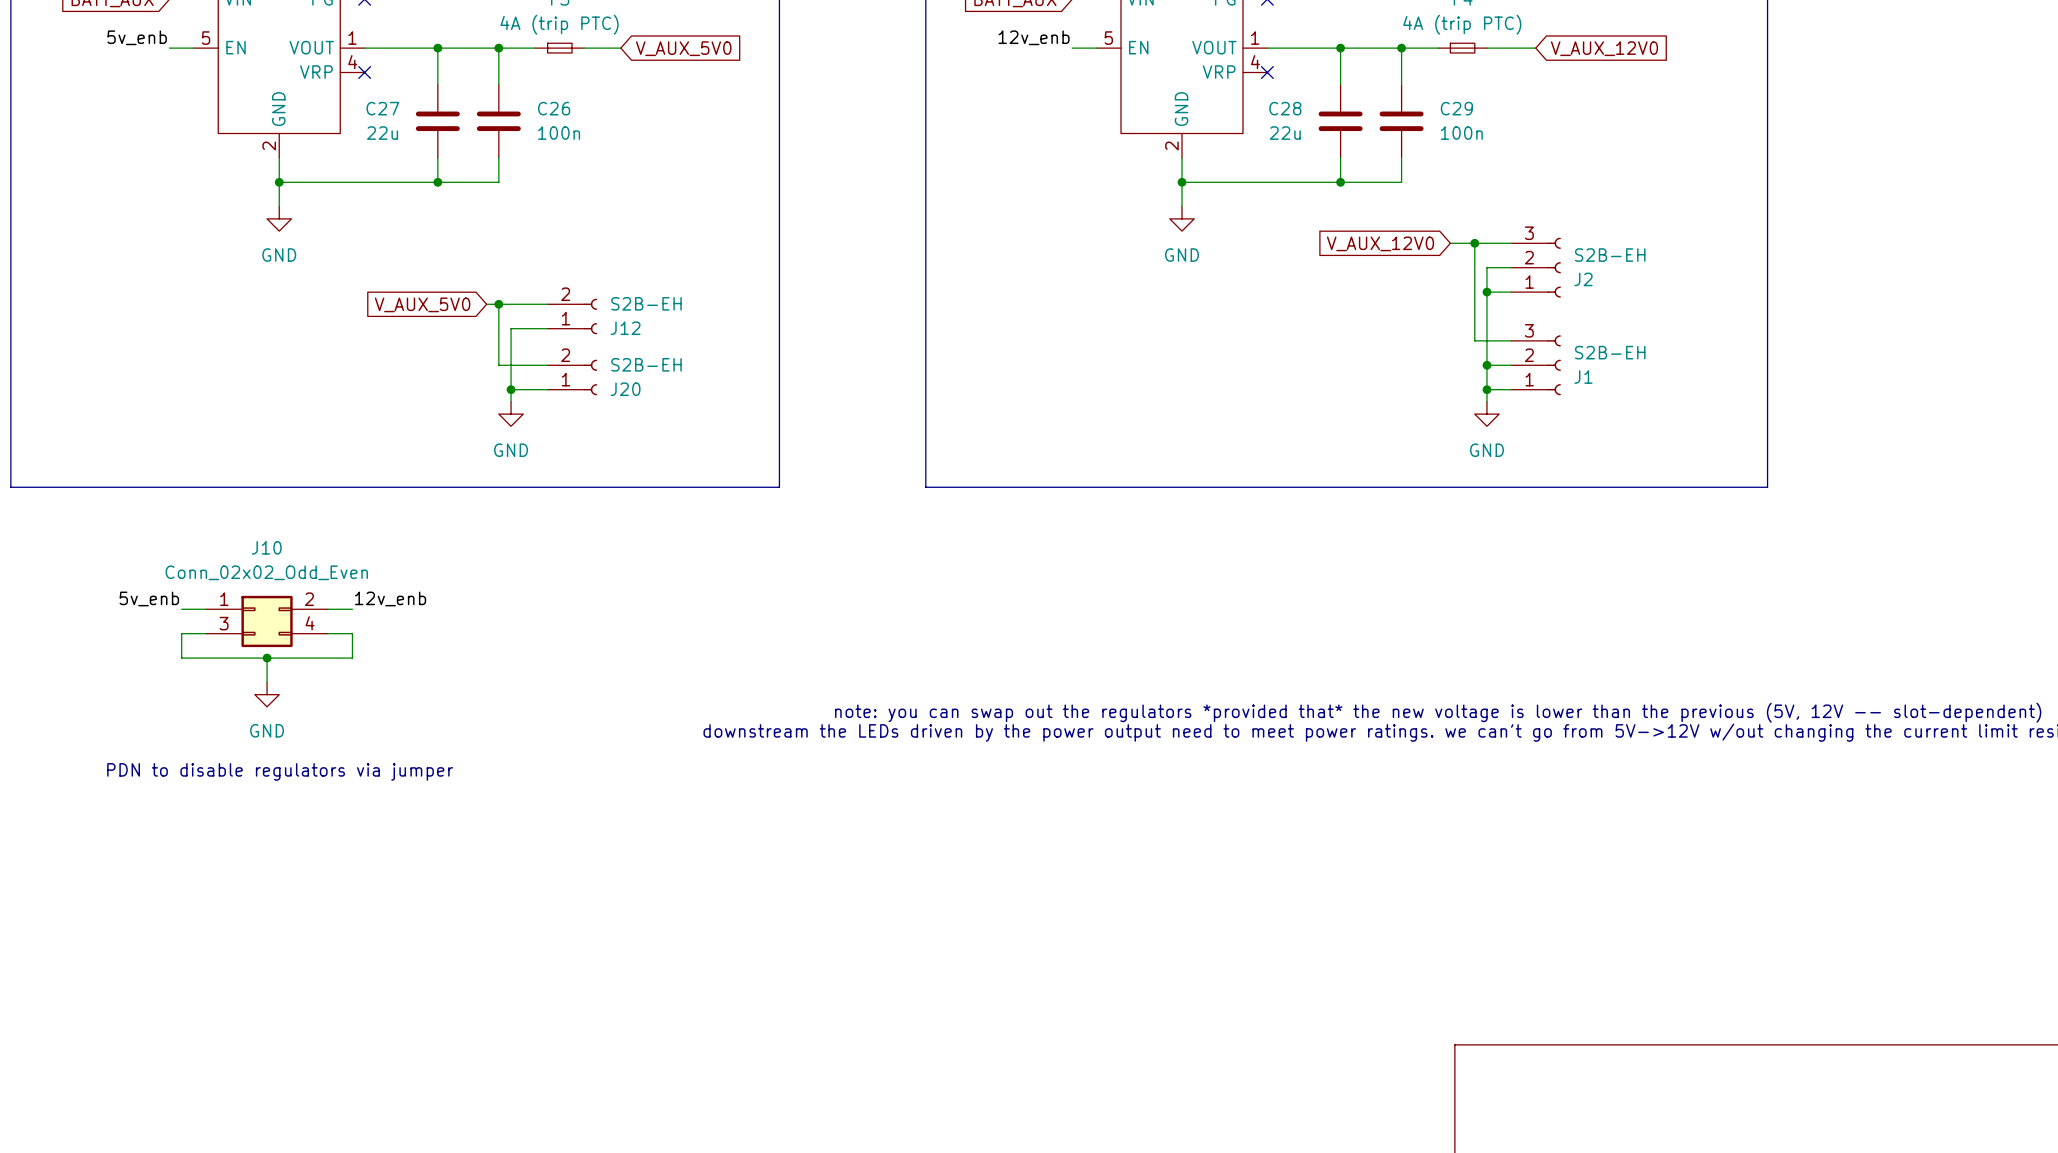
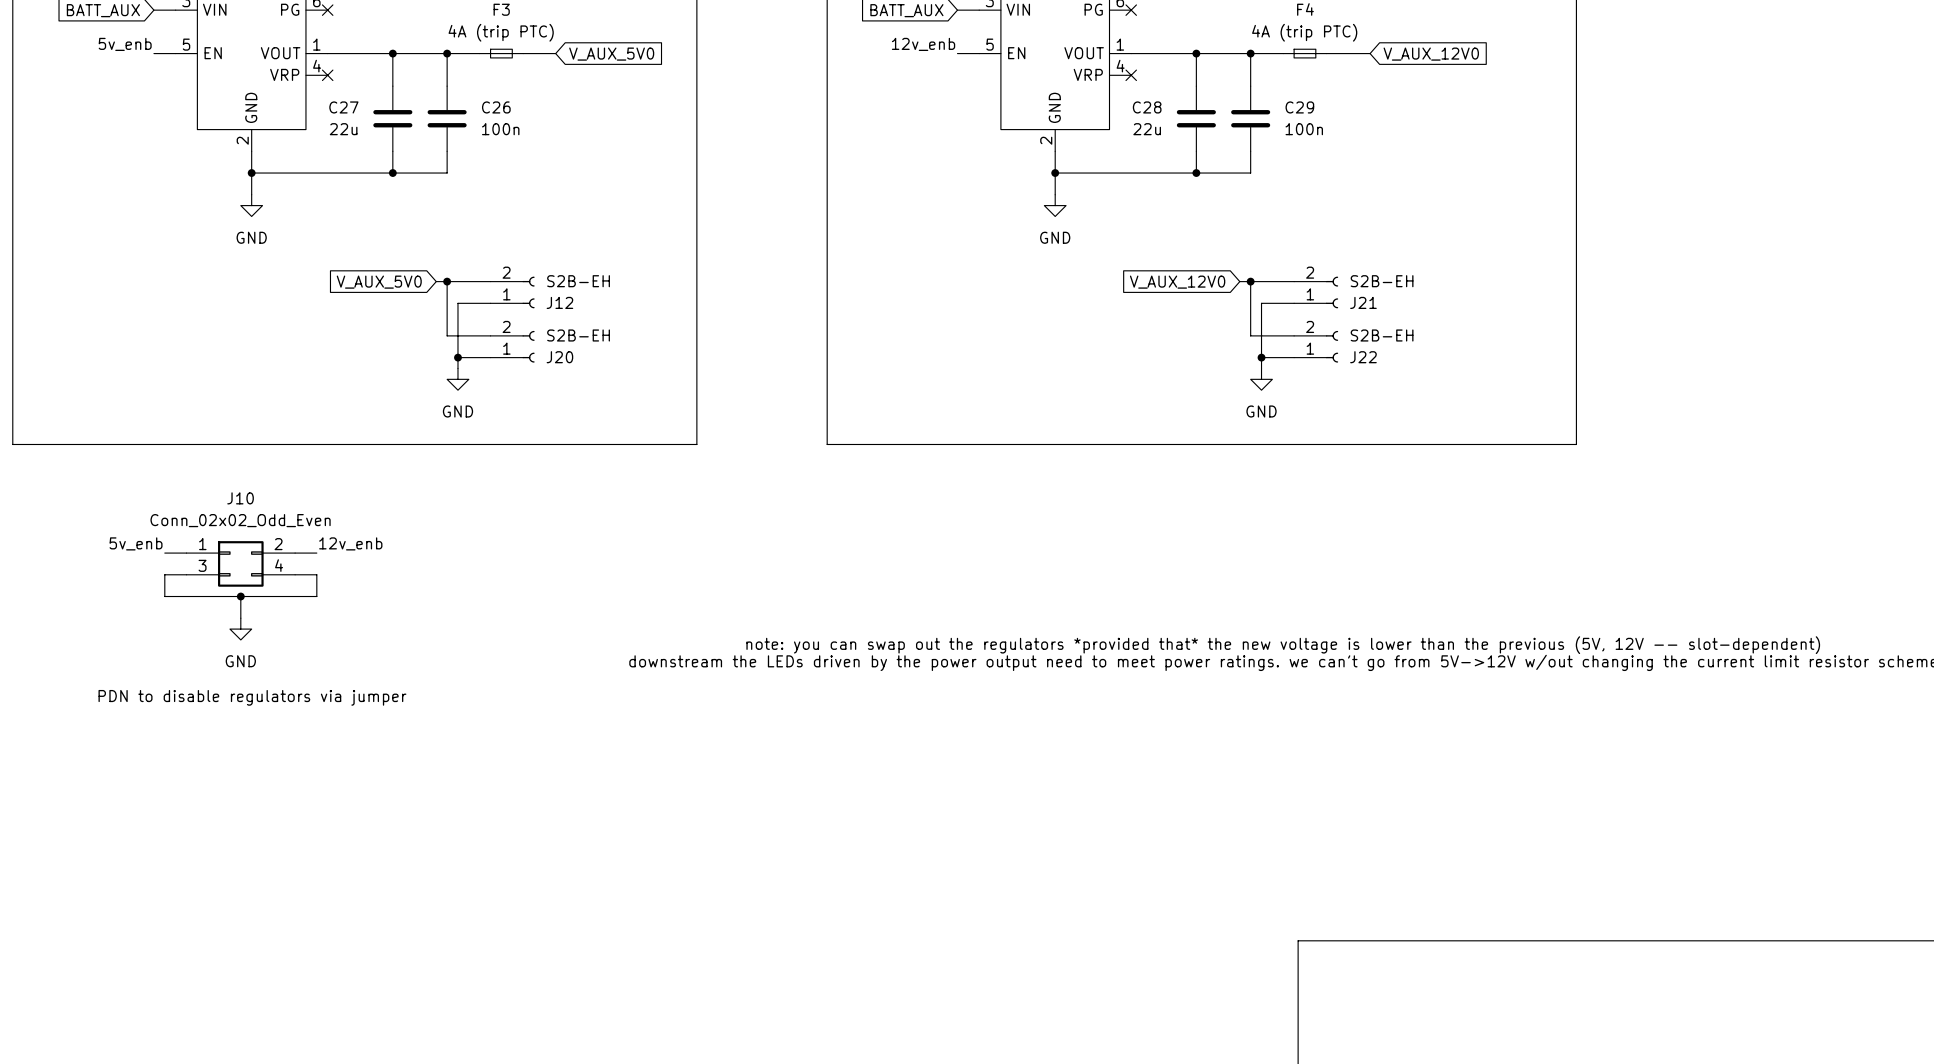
global label position: V_AUX_12V0 (1380, 243) -> V_AUX_12V0 (1177, 282)
wire: (1450, 243) (1511, 243) -> (1239, 281) (1294, 281)
wire: (1474, 243) (1474, 340) (1511, 340) -> none
junction: (1474, 243) -> none
wire: (1511, 267) (1486, 267) (1486, 401) -> none
J2: S2B-EH (1536, 267) -> none
wire: (1486, 292) (1511, 292) -> none
junction: (1486, 292) -> none
wire: none -> (1250, 281) (1250, 335) (1294, 335)
junction: none -> (1250, 281)
J21: none -> S2B-EH (1316, 292)
wire: none -> (1294, 303) (1261, 303) (1261, 368)
wire: (1486, 365) (1511, 365) -> none
junction: (1486, 365) -> none
J1: S2B-EH (1536, 365) -> none
J22: none -> S2B-EH (1316, 346)
wire: none -> (1261, 357) (1294, 357)
junction: none -> (1261, 357)
wire: (1486, 389) (1511, 389) -> none
junction: (1486, 389) -> none
power symbol position: GND (1486, 414) -> GND (1261, 379)

